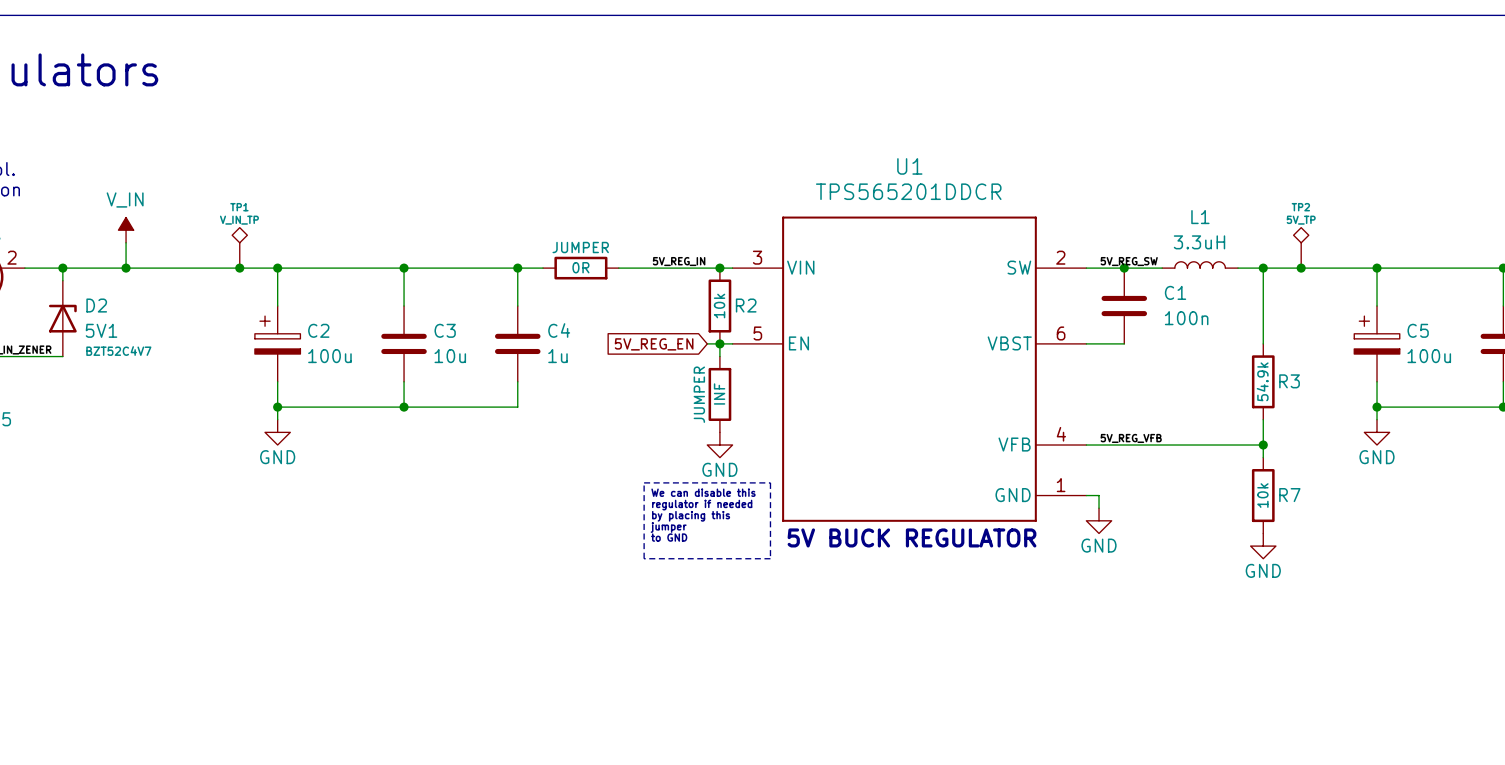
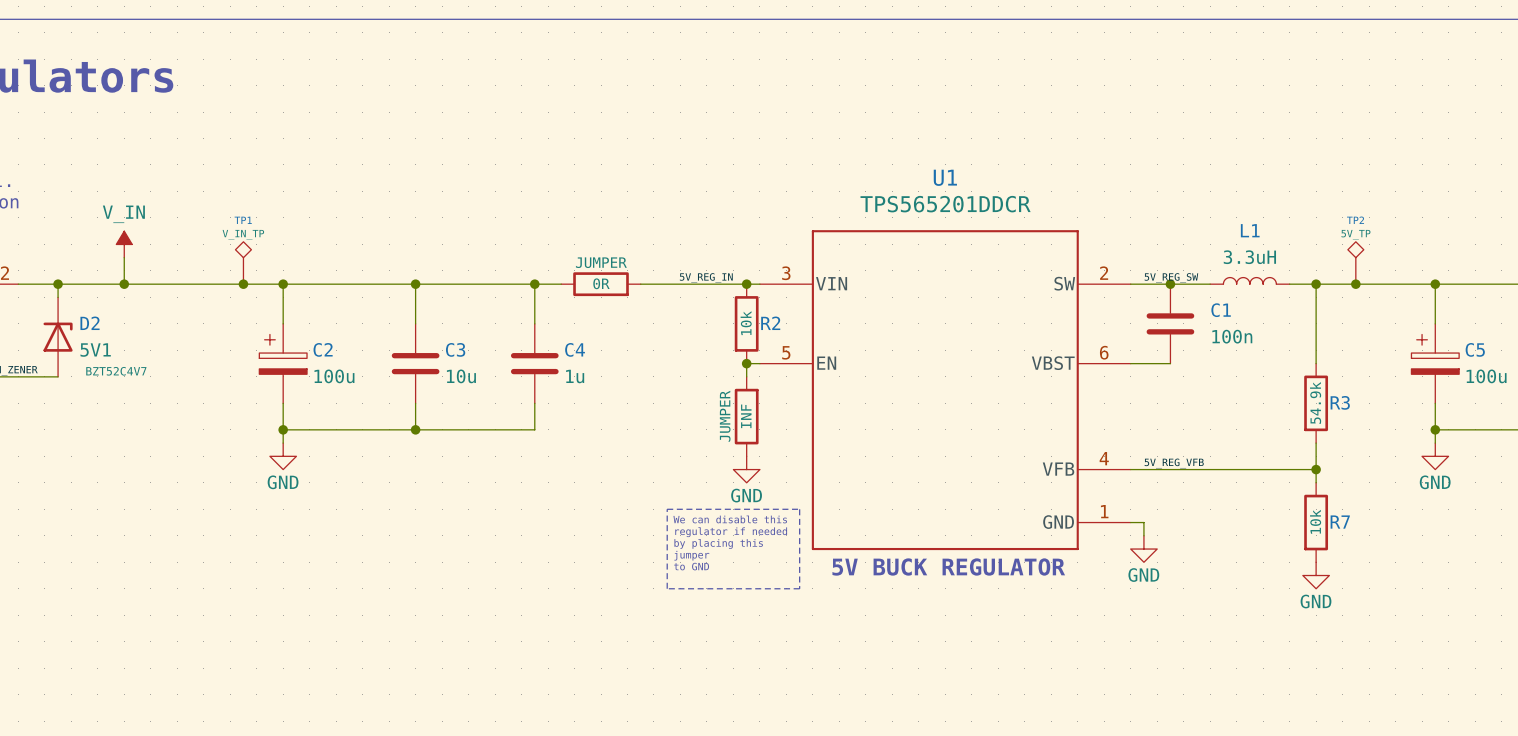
wire: (707, 343) (719, 343) -> none
global label: 5V_REG_EN (654, 344) -> none

